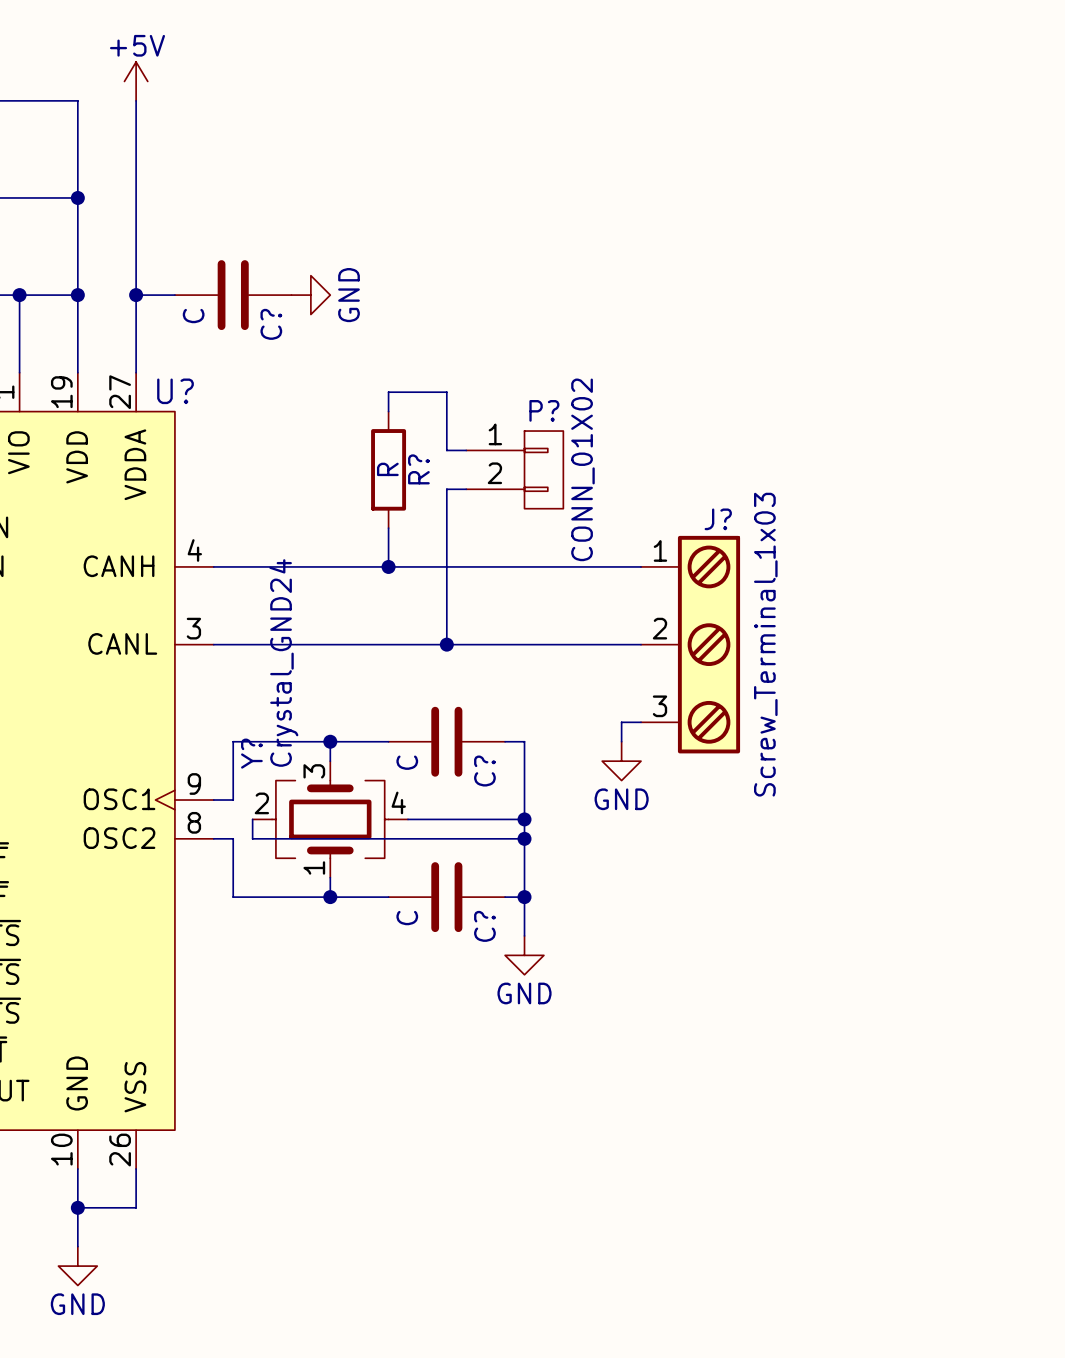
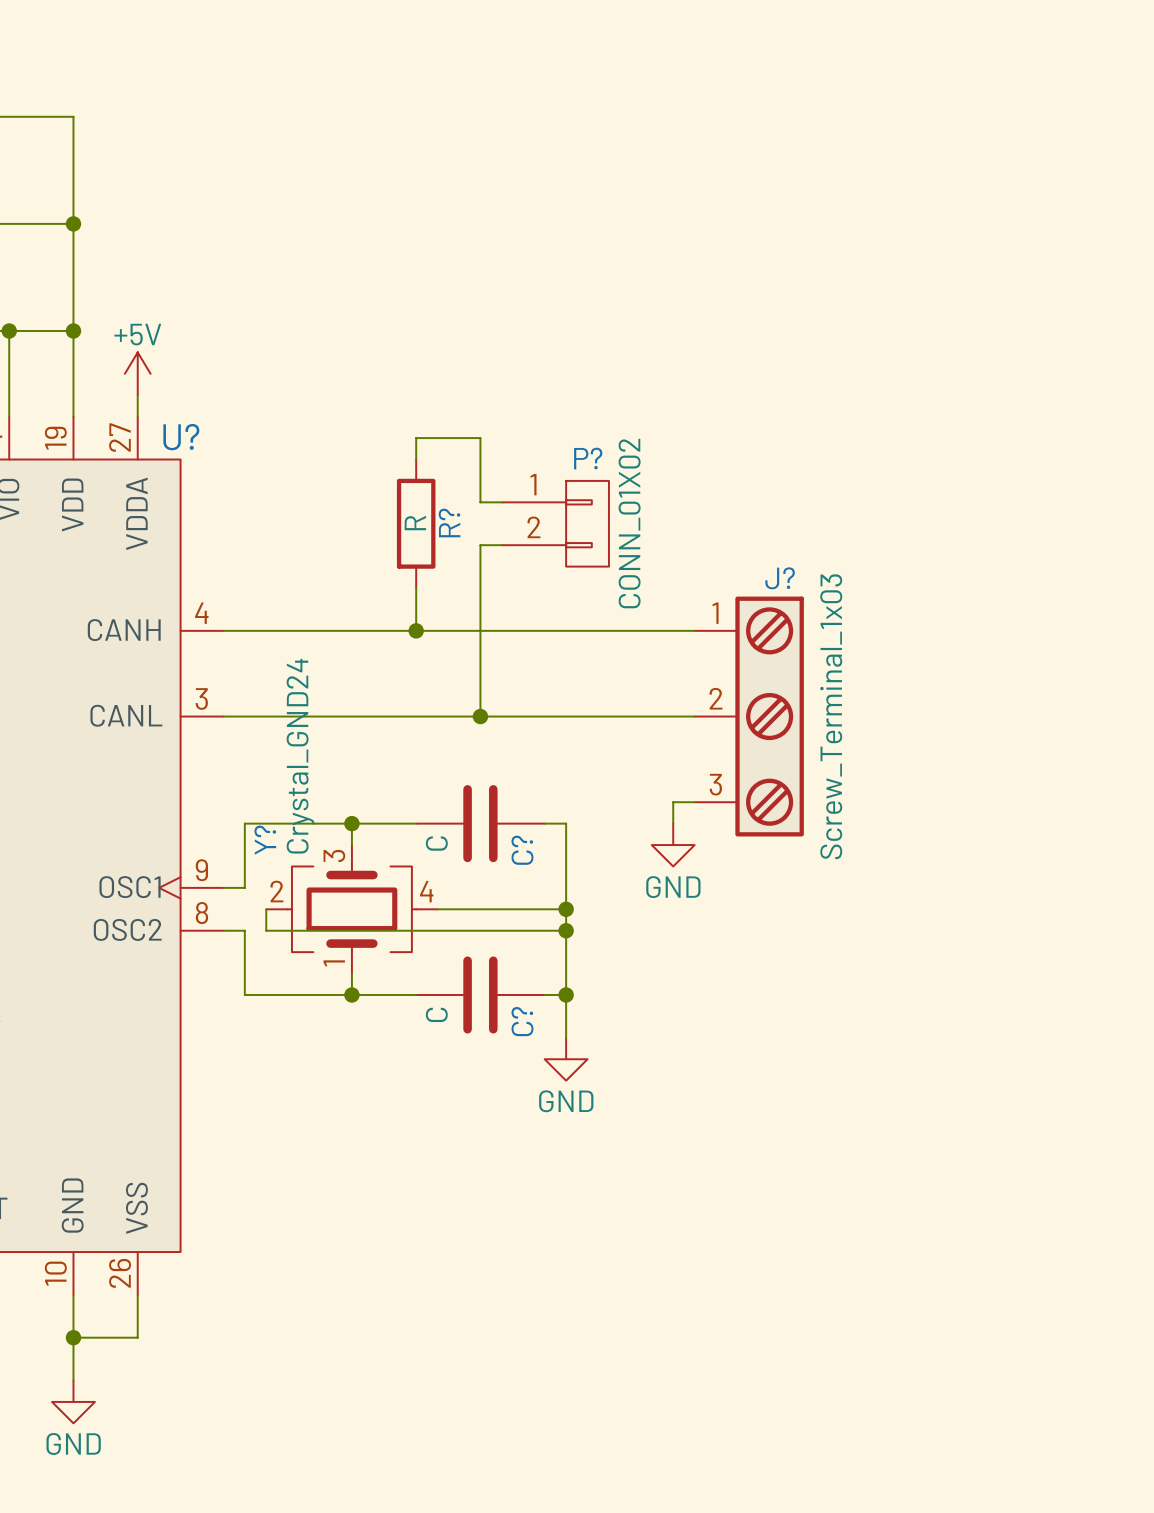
power symbol position: +5V (136, 81) -> +5V (137, 373)
wire: (136, 100) (136, 353) -> none
wire: (136, 295) (174, 295) -> none
junction: (136, 295) -> none
C?: C (233, 295) -> none
power symbol: GND (310, 295) -> none

